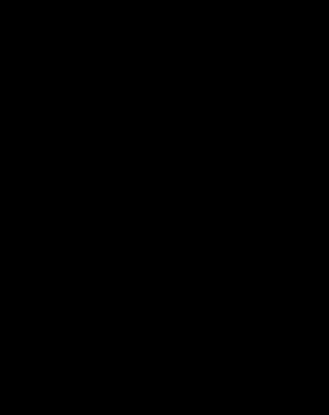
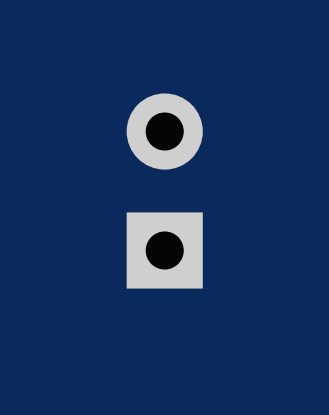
part: none -> (164, 191)

